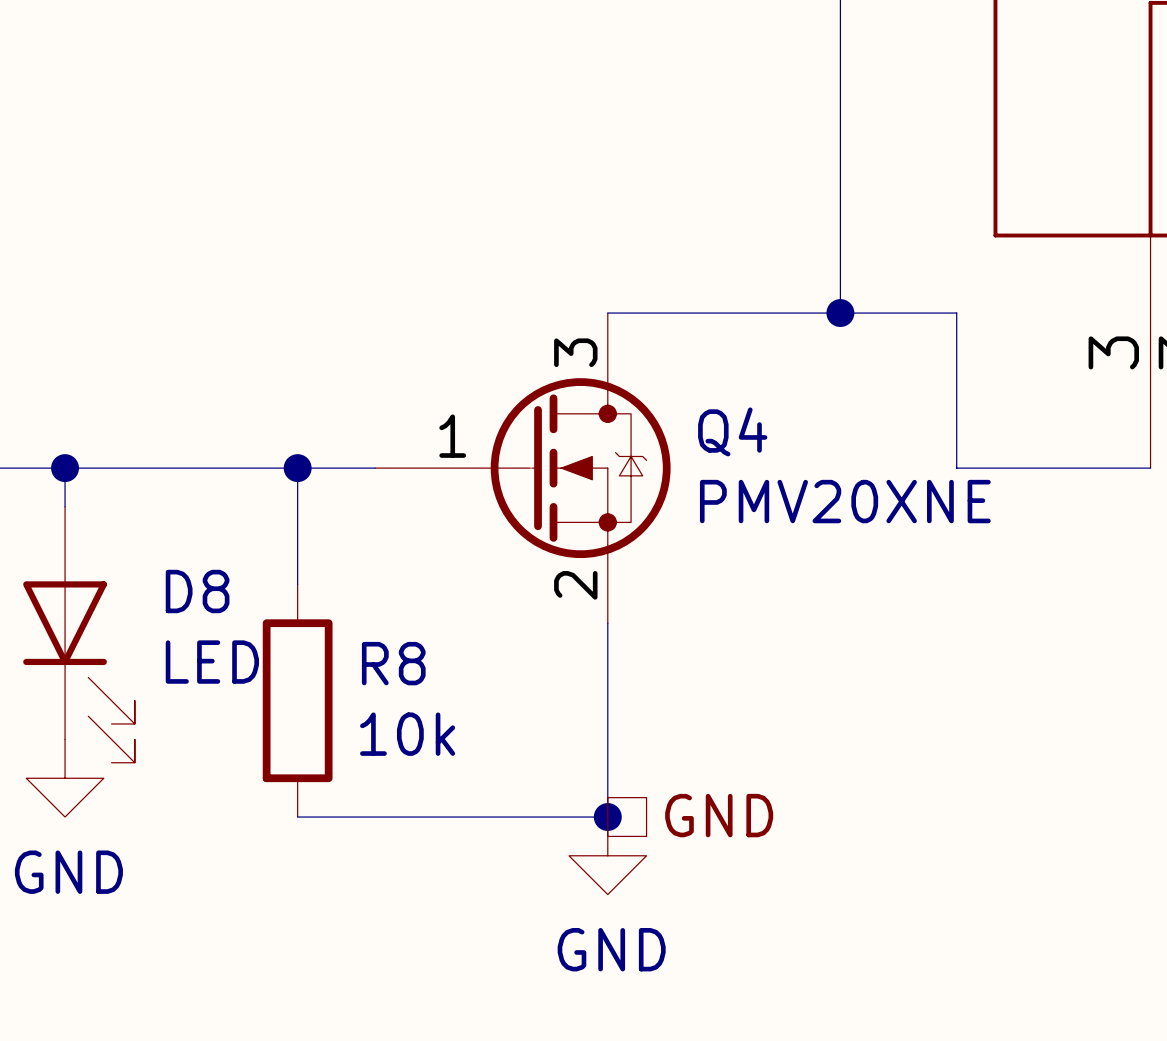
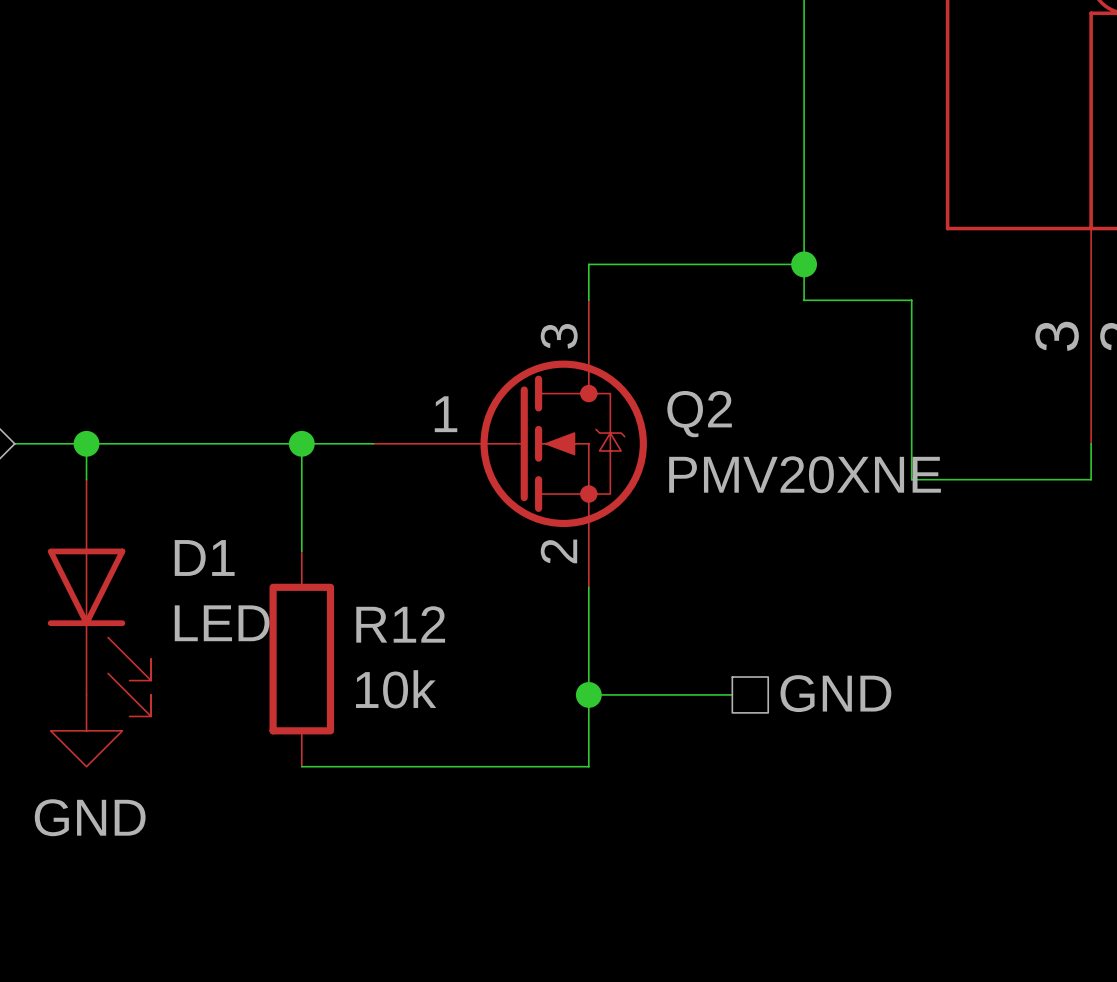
wire: (607, 313) (840, 313) -> (588, 300) (588, 264) (804, 264)
junction position: (840, 313) -> (804, 264)
Q4 name: Q4 (732, 431) -> Q2 (699, 414)
wire: (956, 468) (1150, 468) -> (911, 443) (911, 479) (1091, 479) (1091, 443)
D8 name: D8 (197, 591) -> D1 (204, 557)
R8 name: R8 (393, 663) -> R12 (400, 624)
wire: none -> (588, 694) (732, 694)
hierarchical label position: GND (719, 815) -> GND (835, 693)
junction position: (607, 817) -> (588, 694)
power symbol: GND (607, 855) -> none

